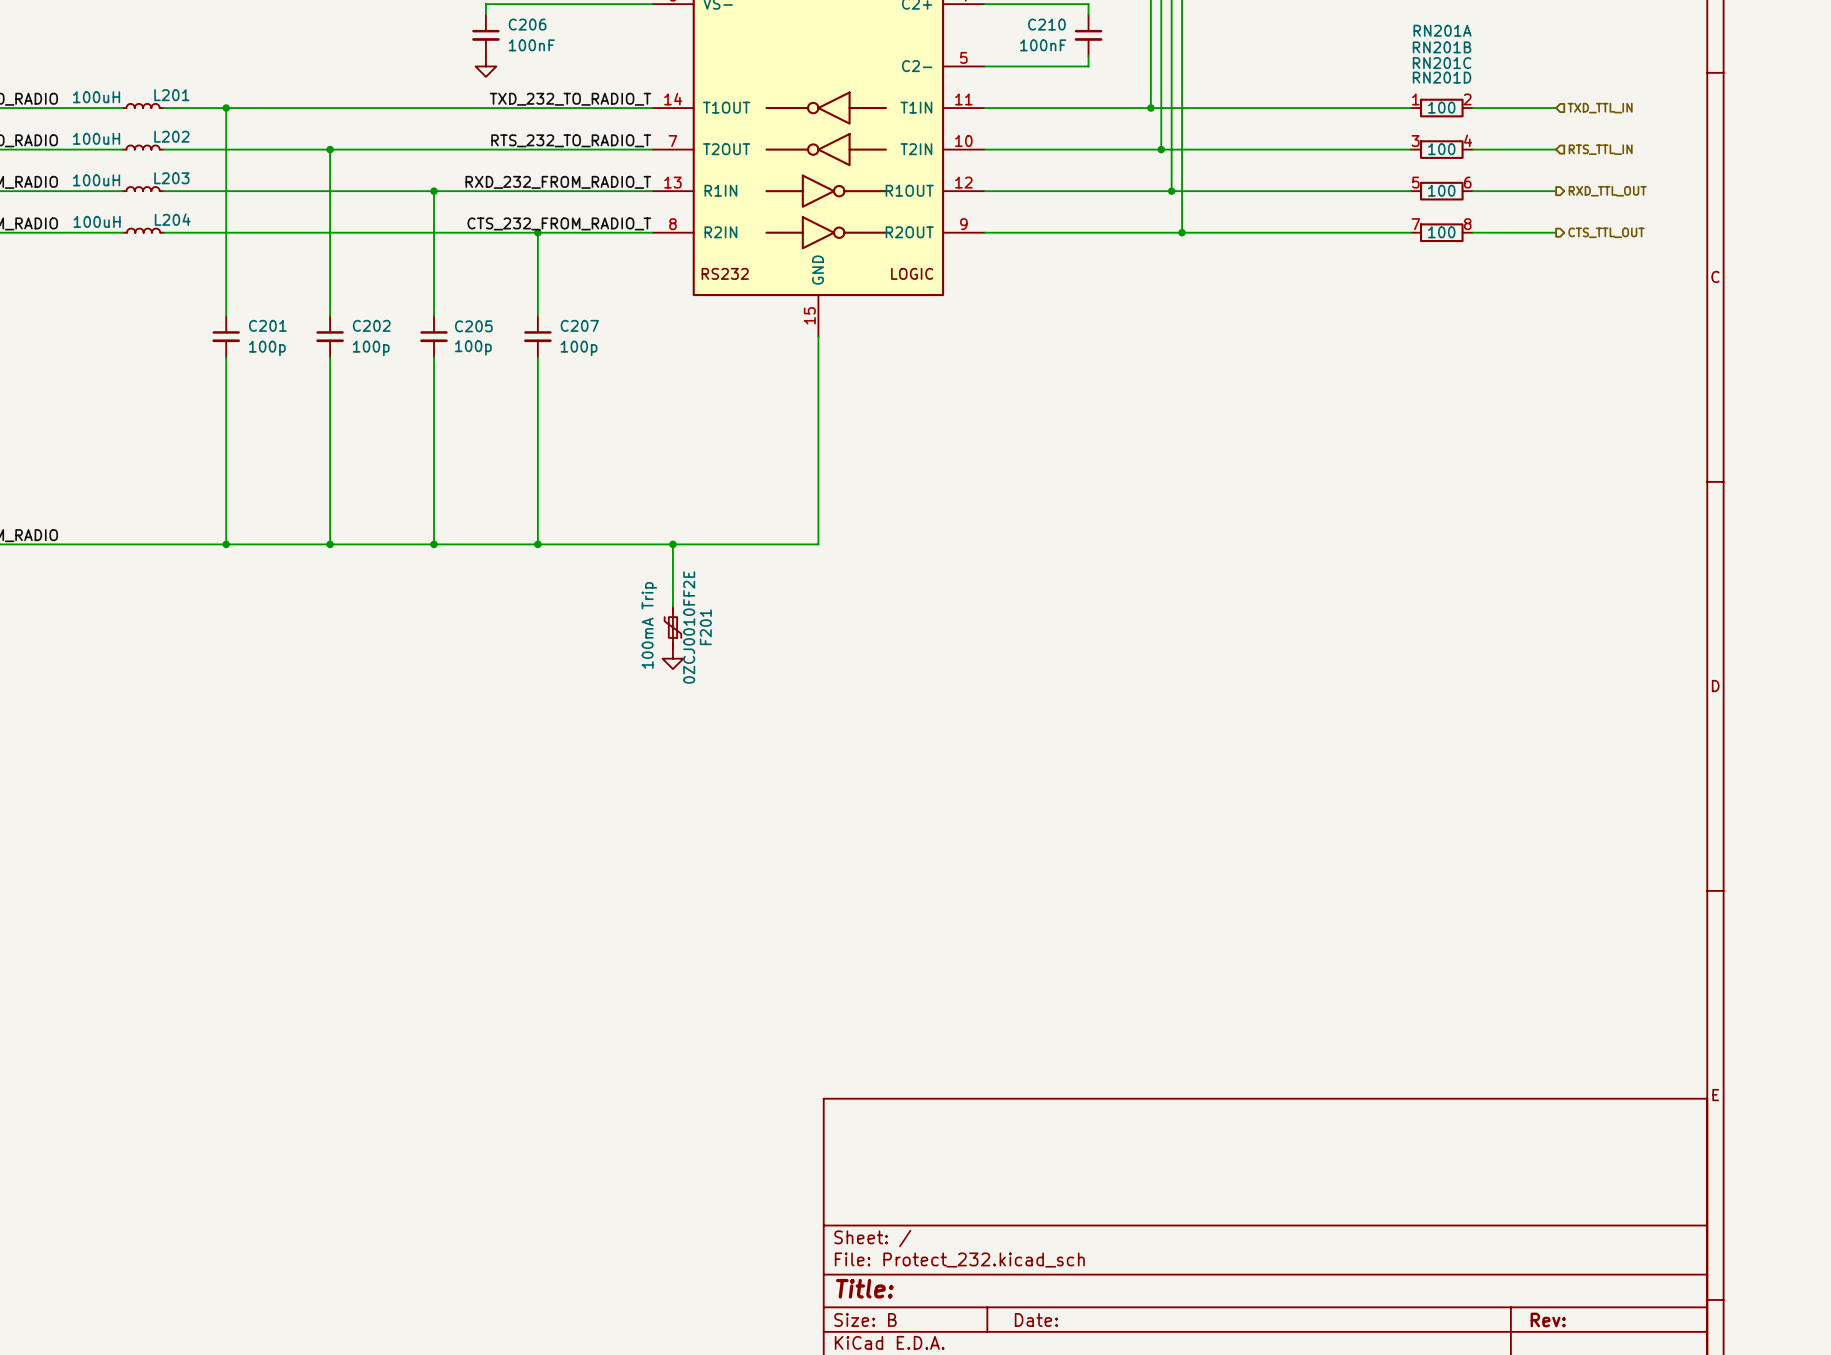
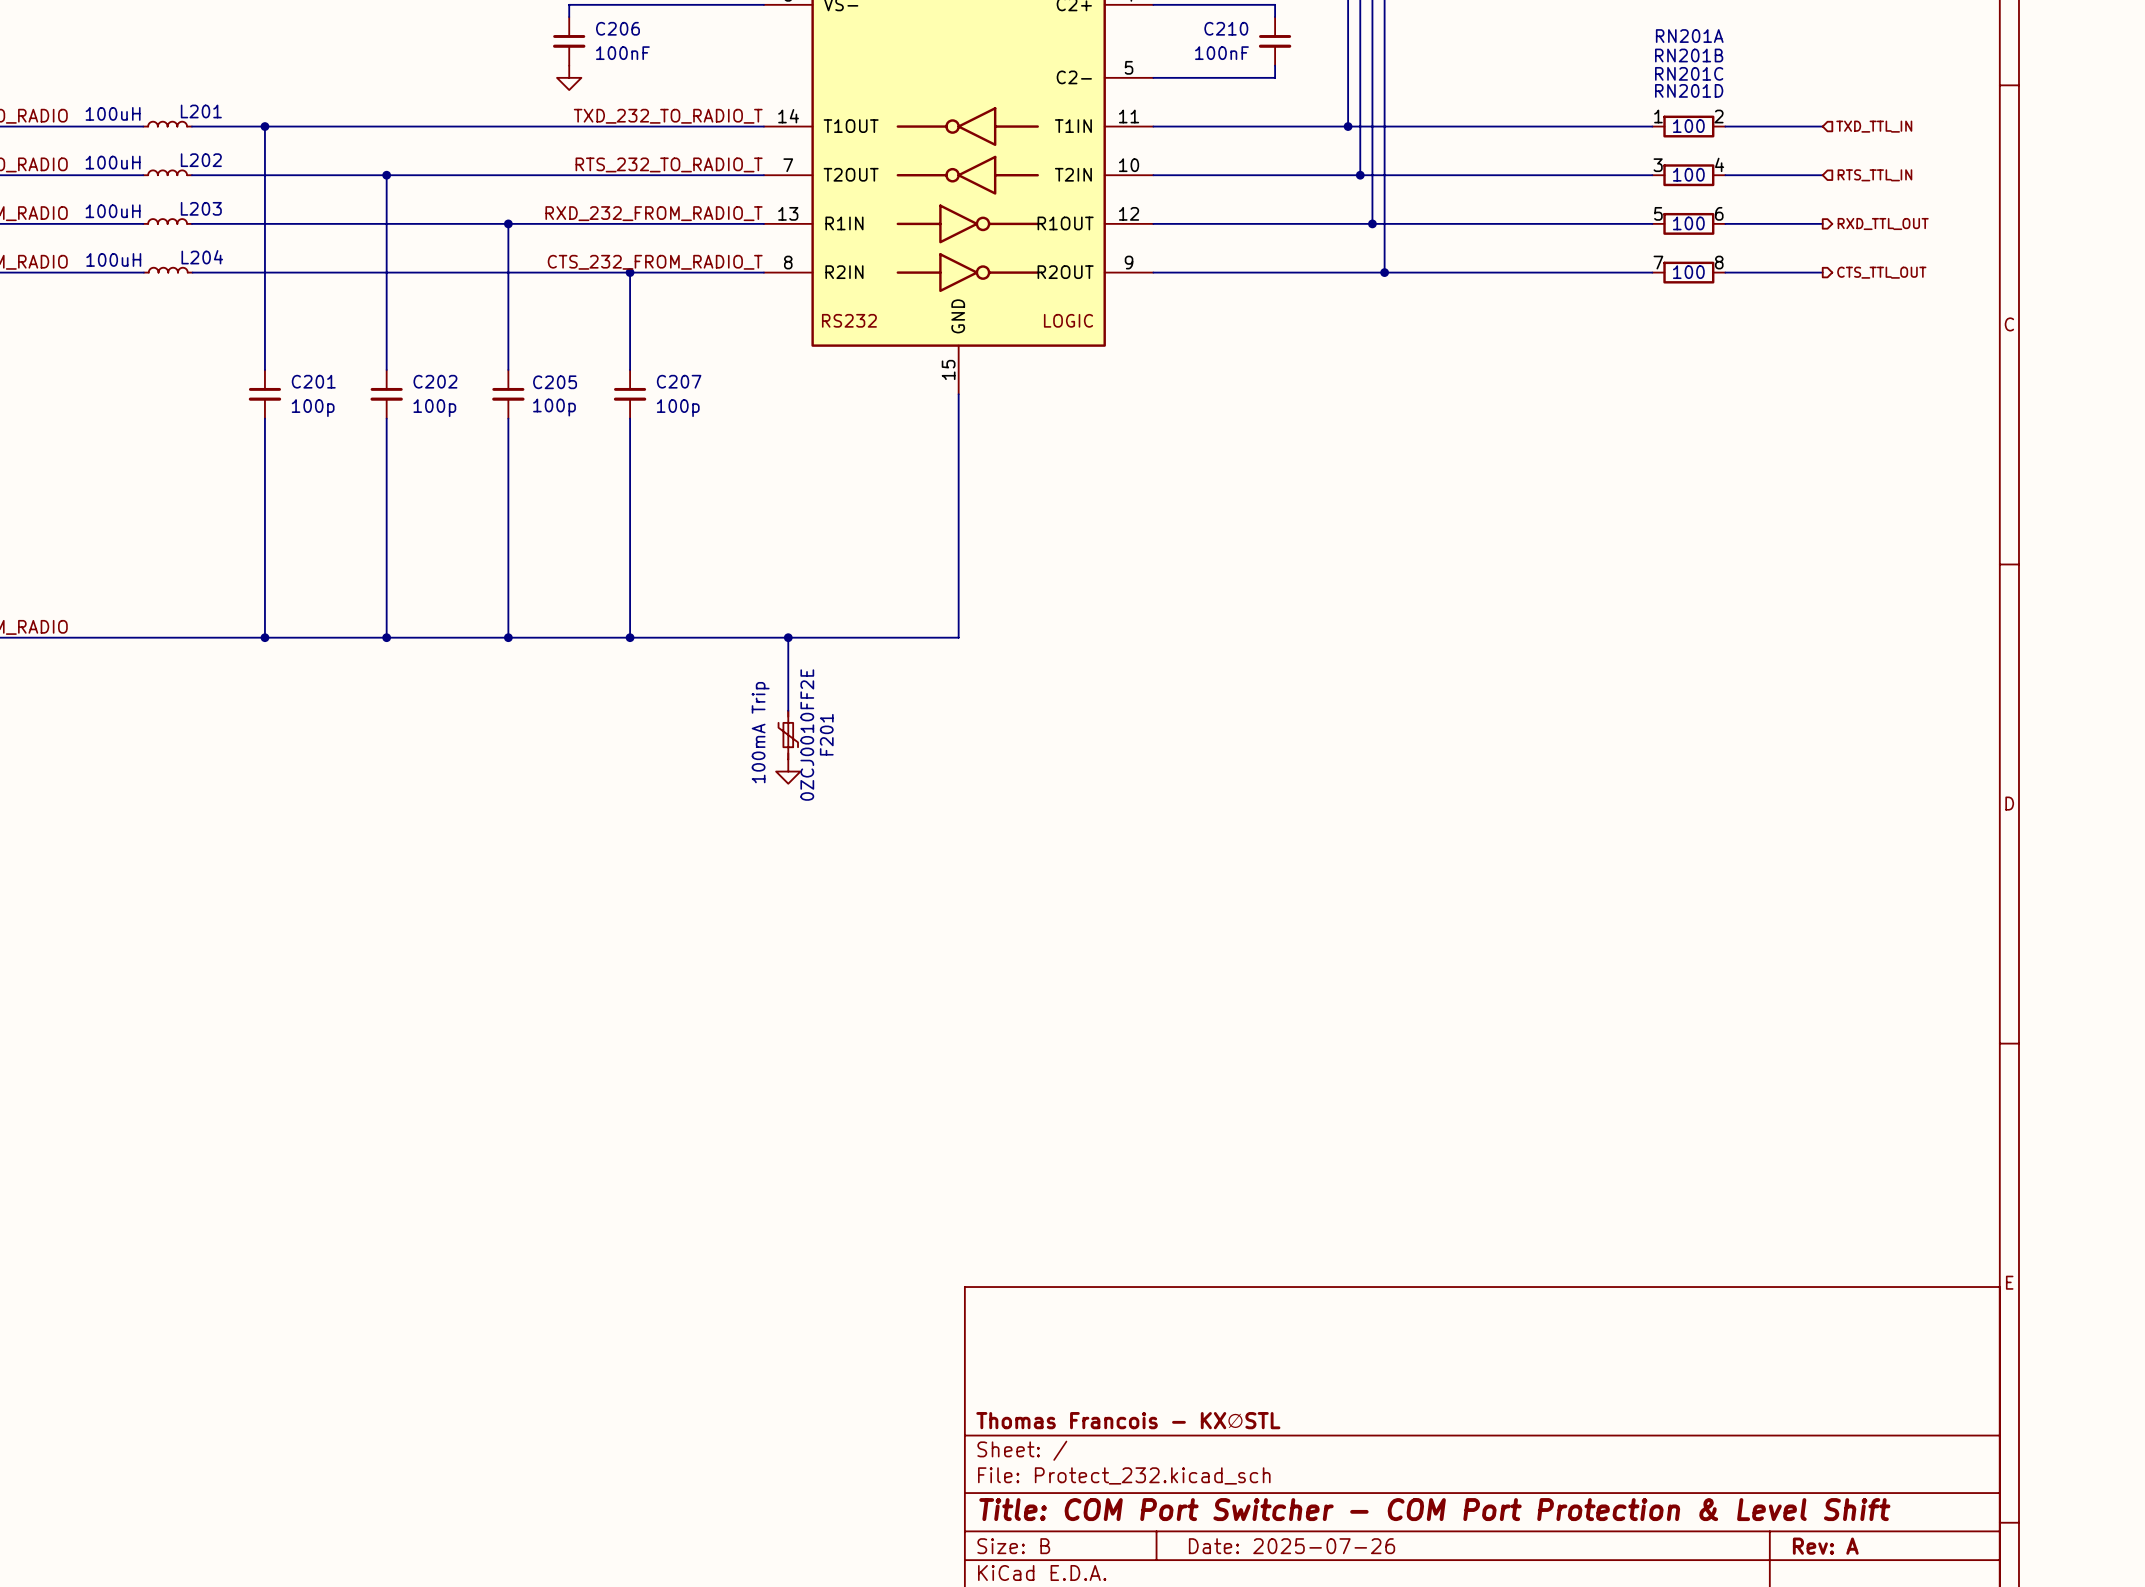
title block: none -> Thomas Francois - KX∅STL (1128, 1420)
title block: Title: (864, 1288) -> Title: COM Port Switcher - COM Port Protection & Level Shift (1434, 1509)
title block: Date: (1036, 1319) -> Date: 2025-07-26 (1292, 1546)
title block: Rev: (1548, 1319) -> Rev: A (1825, 1546)

